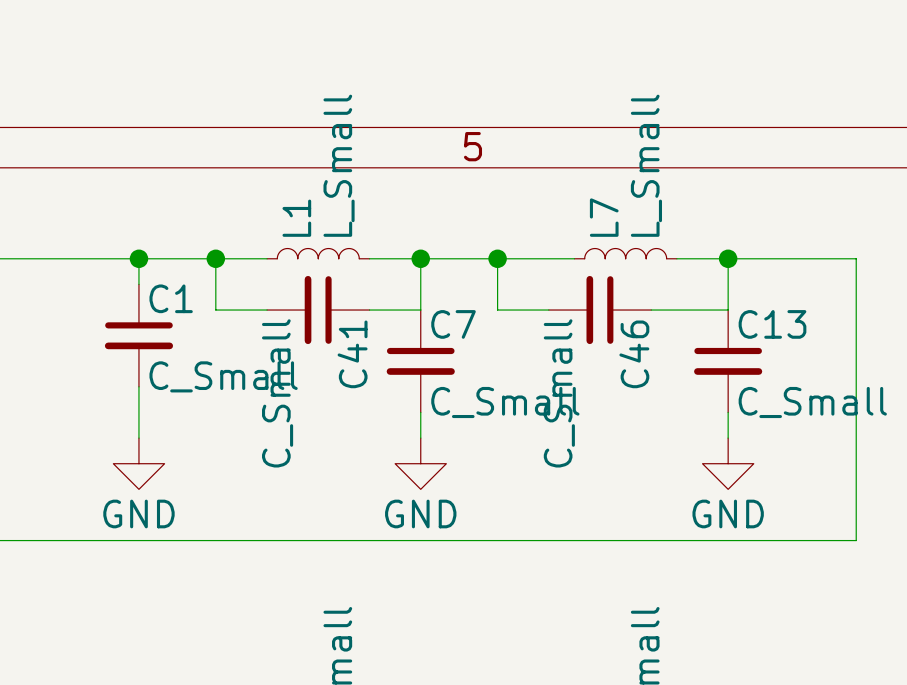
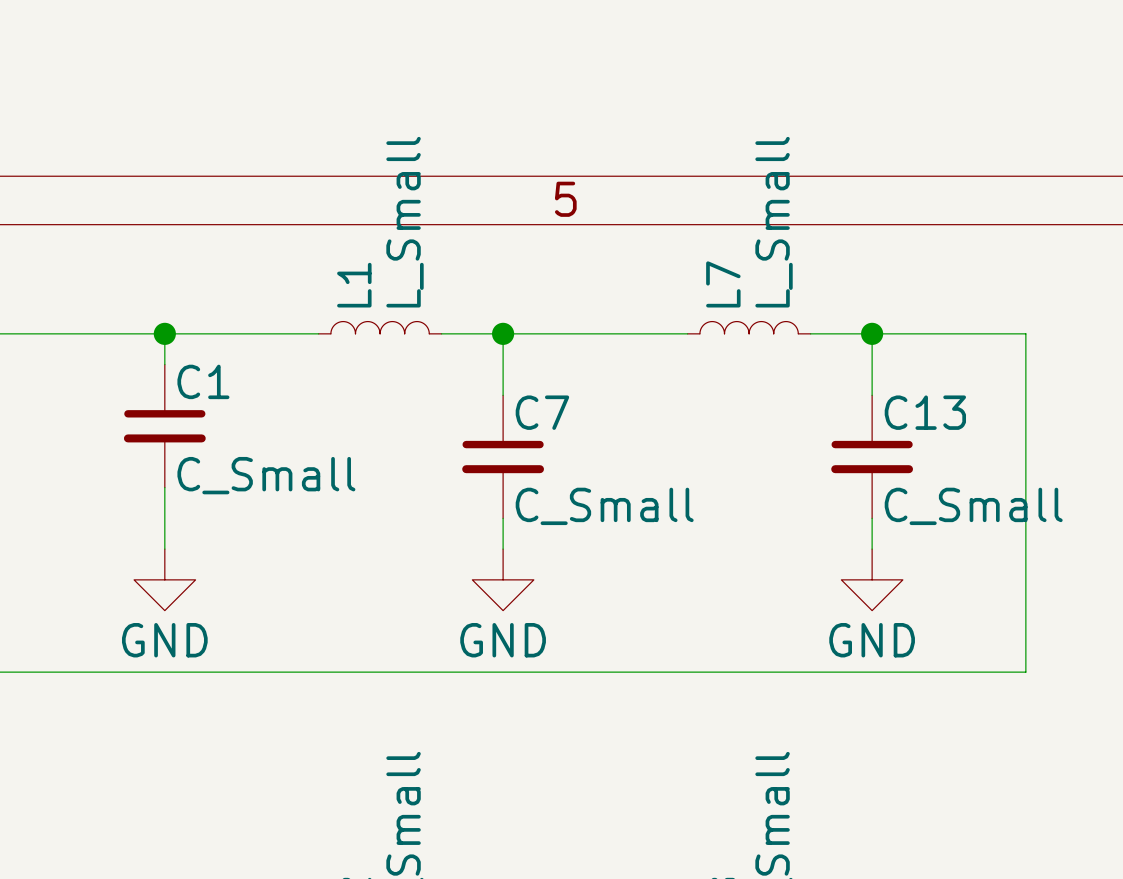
wire: (215, 258) (215, 310) (267, 310) -> none
junction: (215, 258) -> none
wire: (497, 258) (497, 310) (548, 310) -> none
junction: (497, 258) -> none
C41: C_Small (318, 310) -> none
wire: (369, 310) (420, 310) -> none
C46: C_Small (600, 310) -> none
wire: (651, 310) (728, 310) -> none

